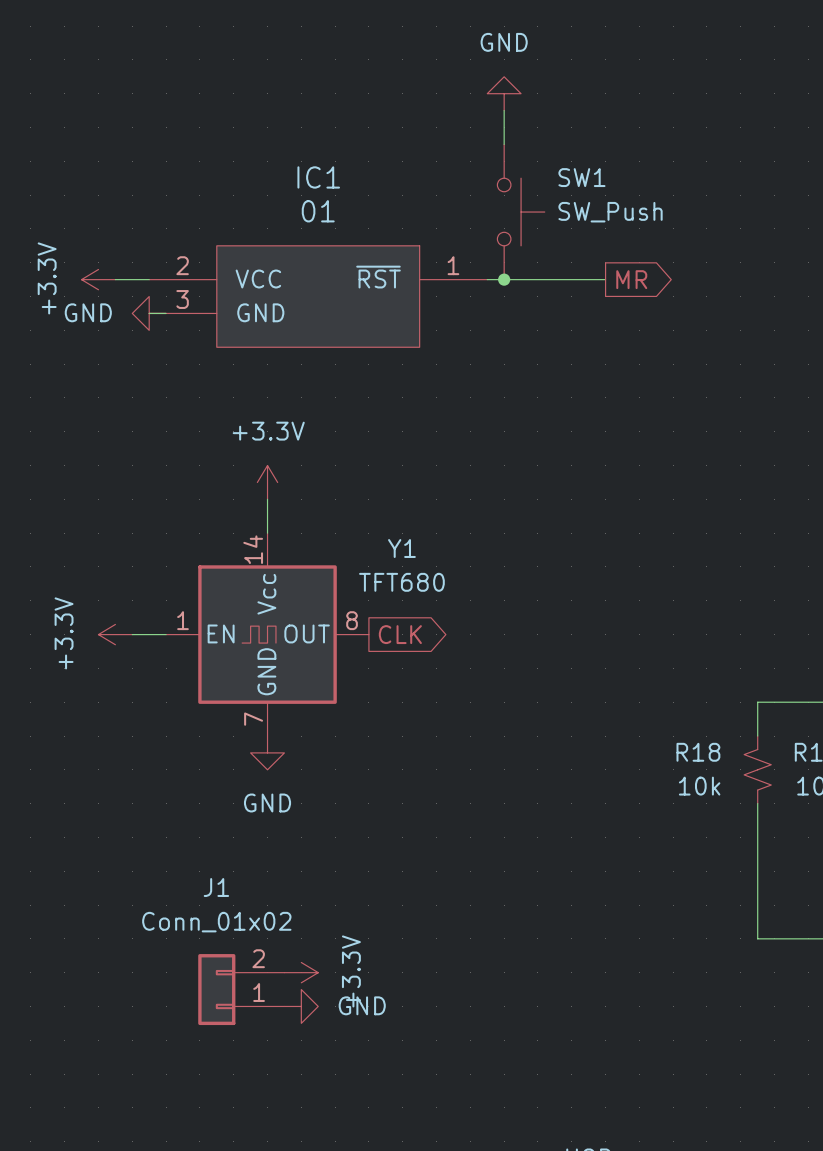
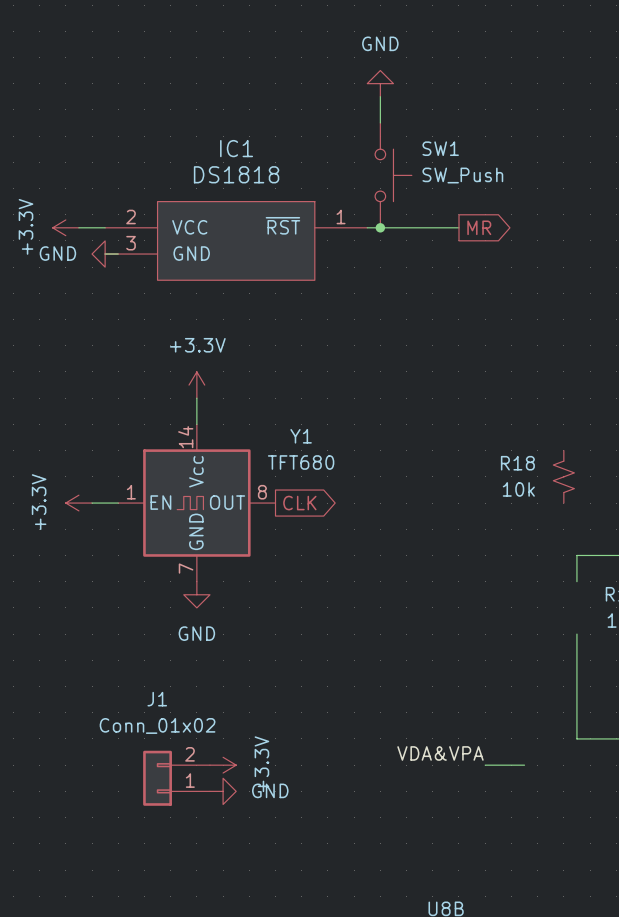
IC1 value: 01 (318, 211) -> DS1818 (236, 174)
R18 position: (757, 769) -> (563, 476)
label: none -> VDA&VPA (440, 753)
wire: none -> (485, 765) (524, 765)

